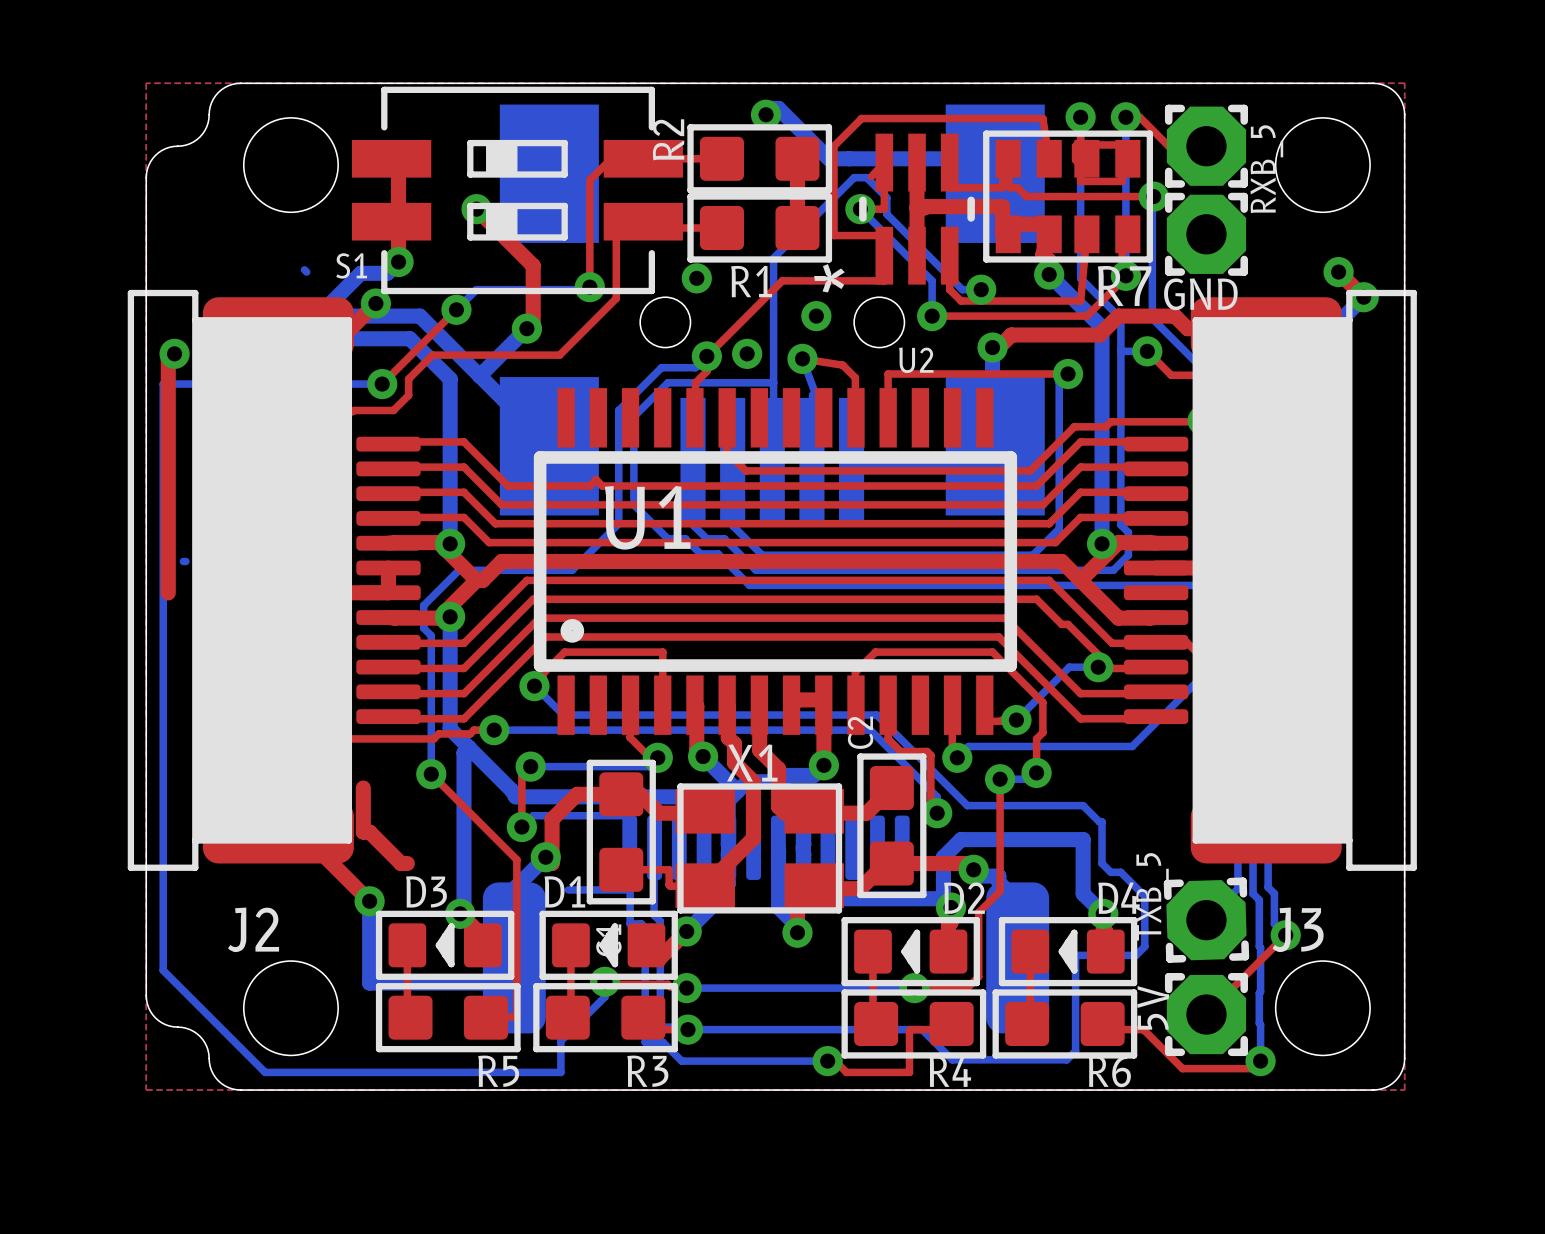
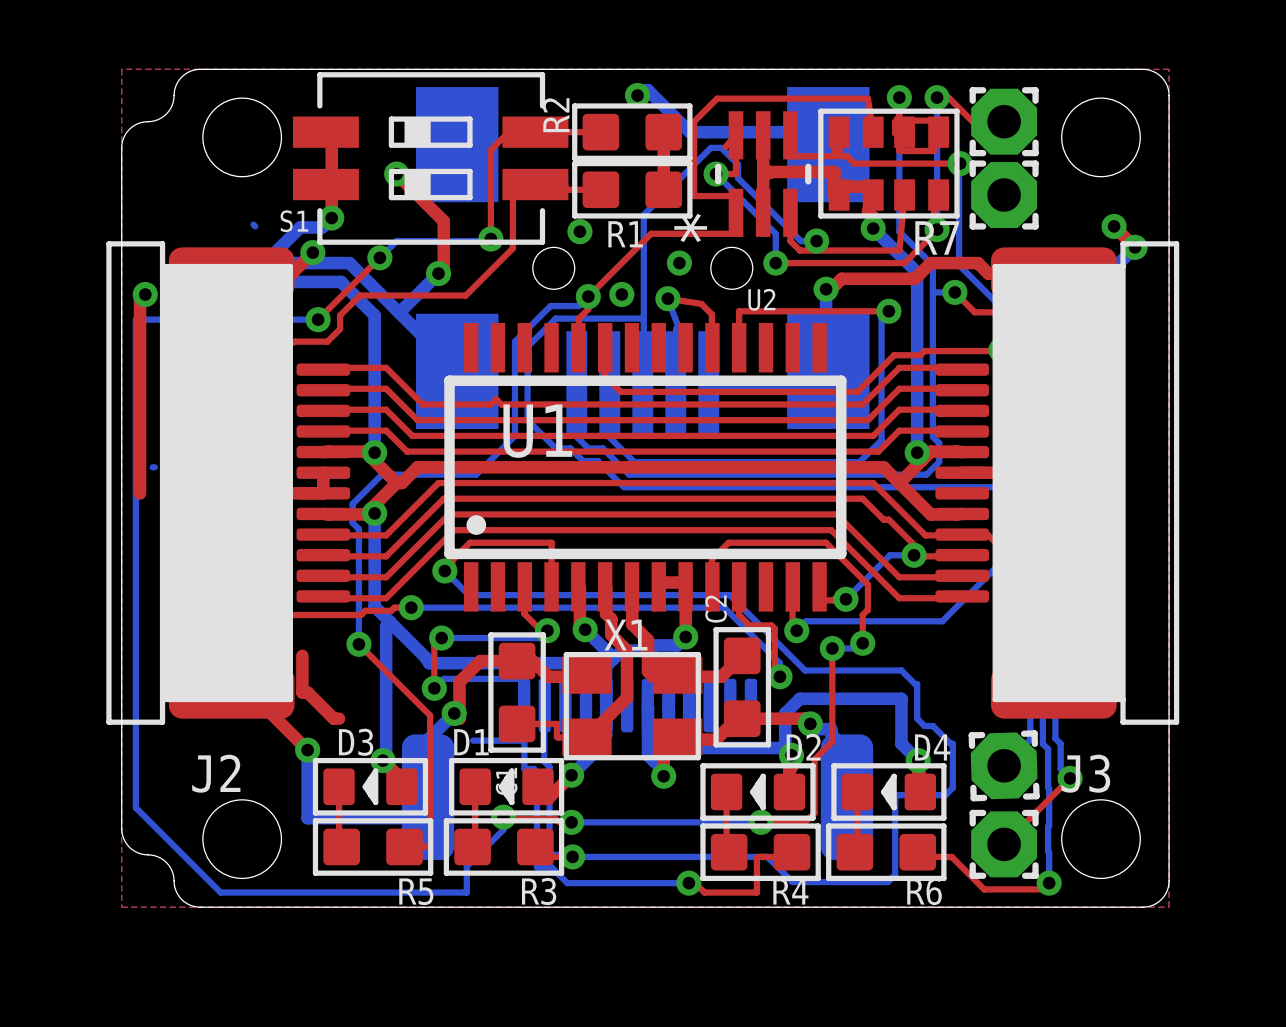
RXB_5 name: RXB_5 (1266, 169) -> none
GND name: GND (1200, 294) -> none
TXB_5 name: TXB_5 (1152, 896) -> none
5V name: 5V (1153, 1007) -> none

